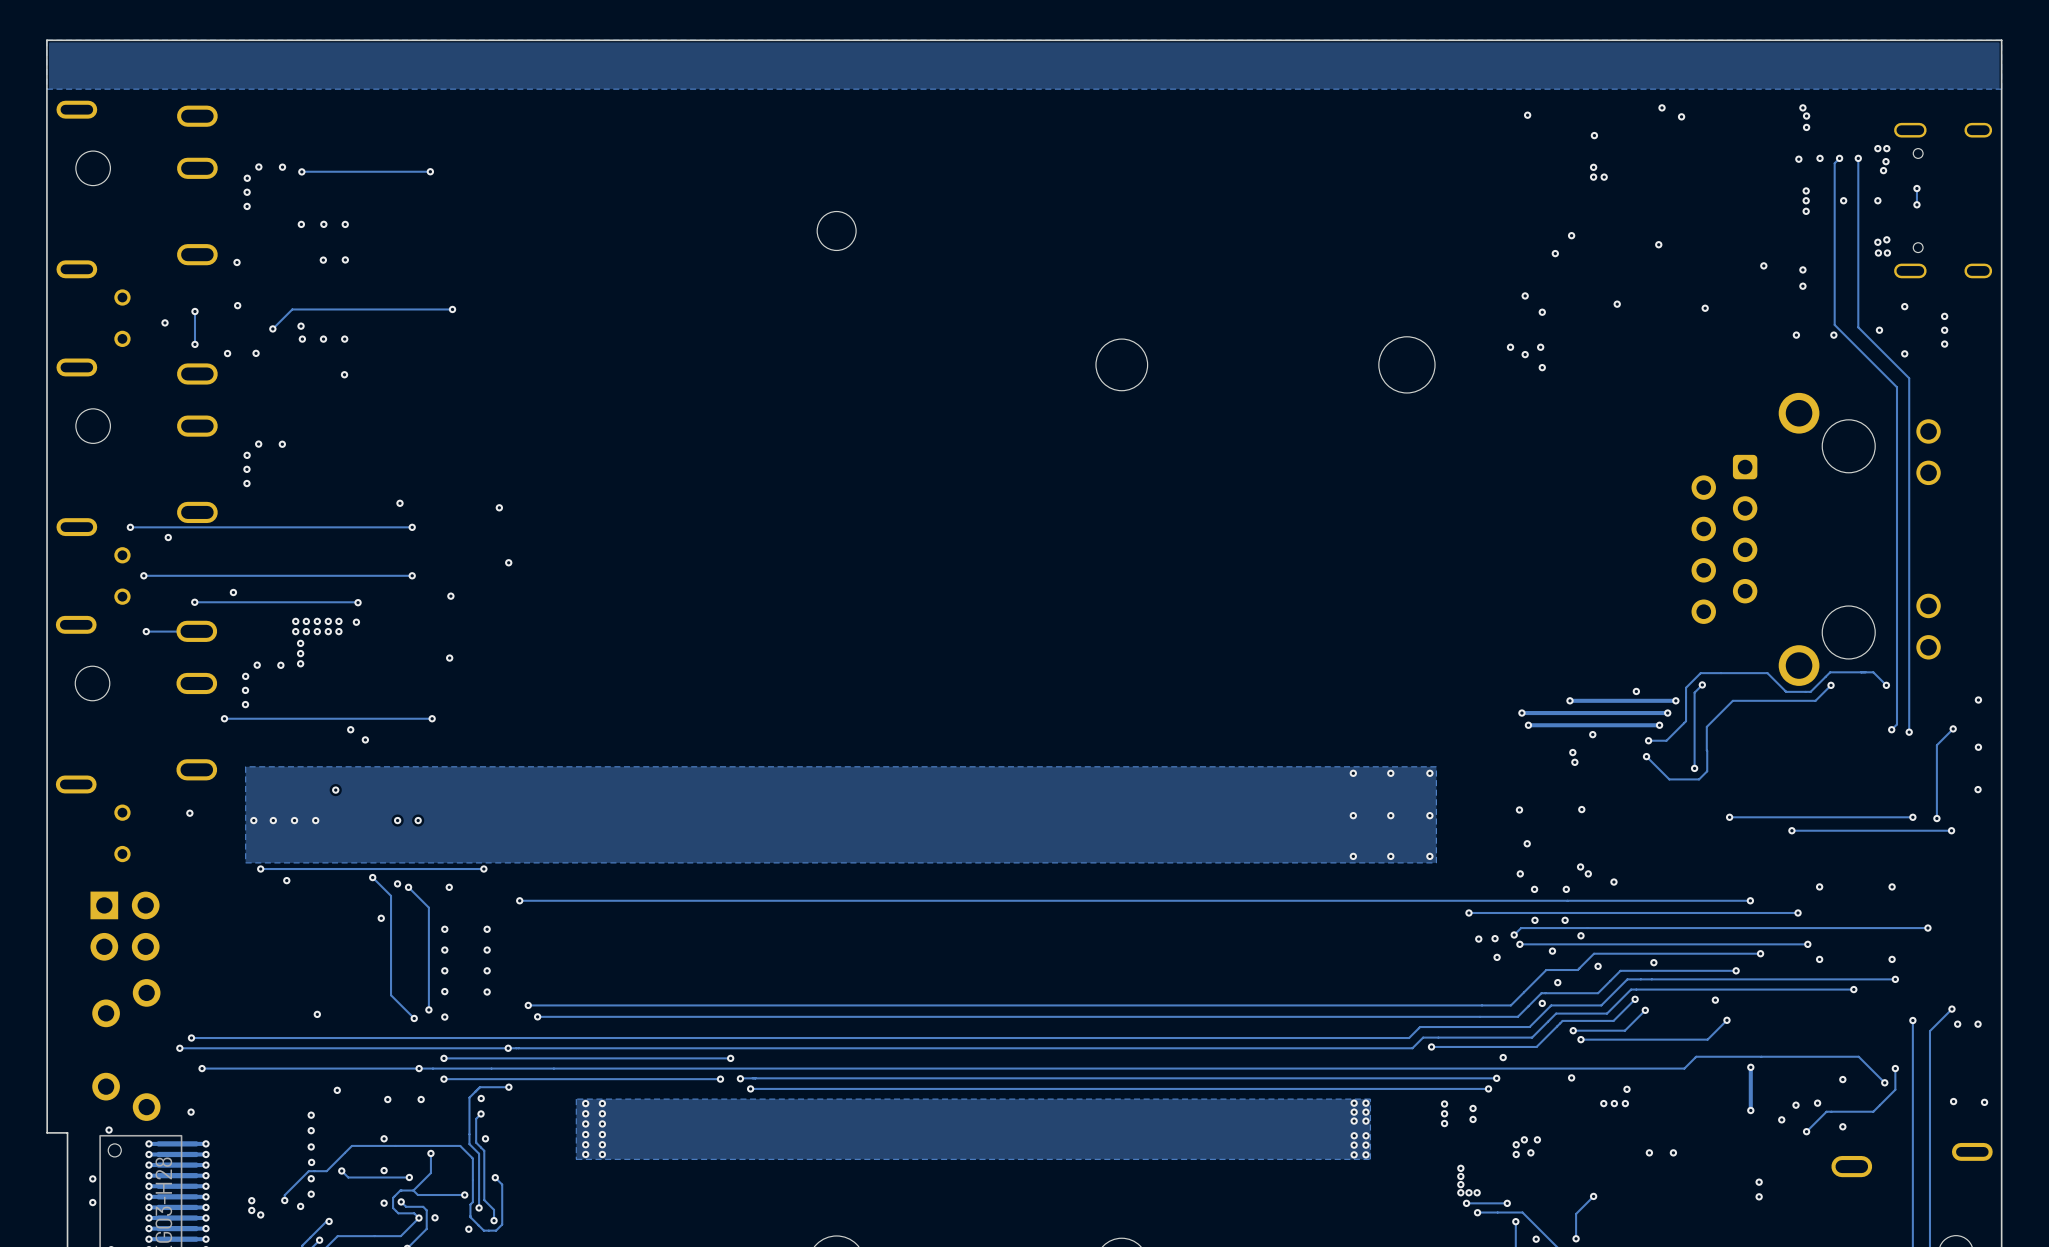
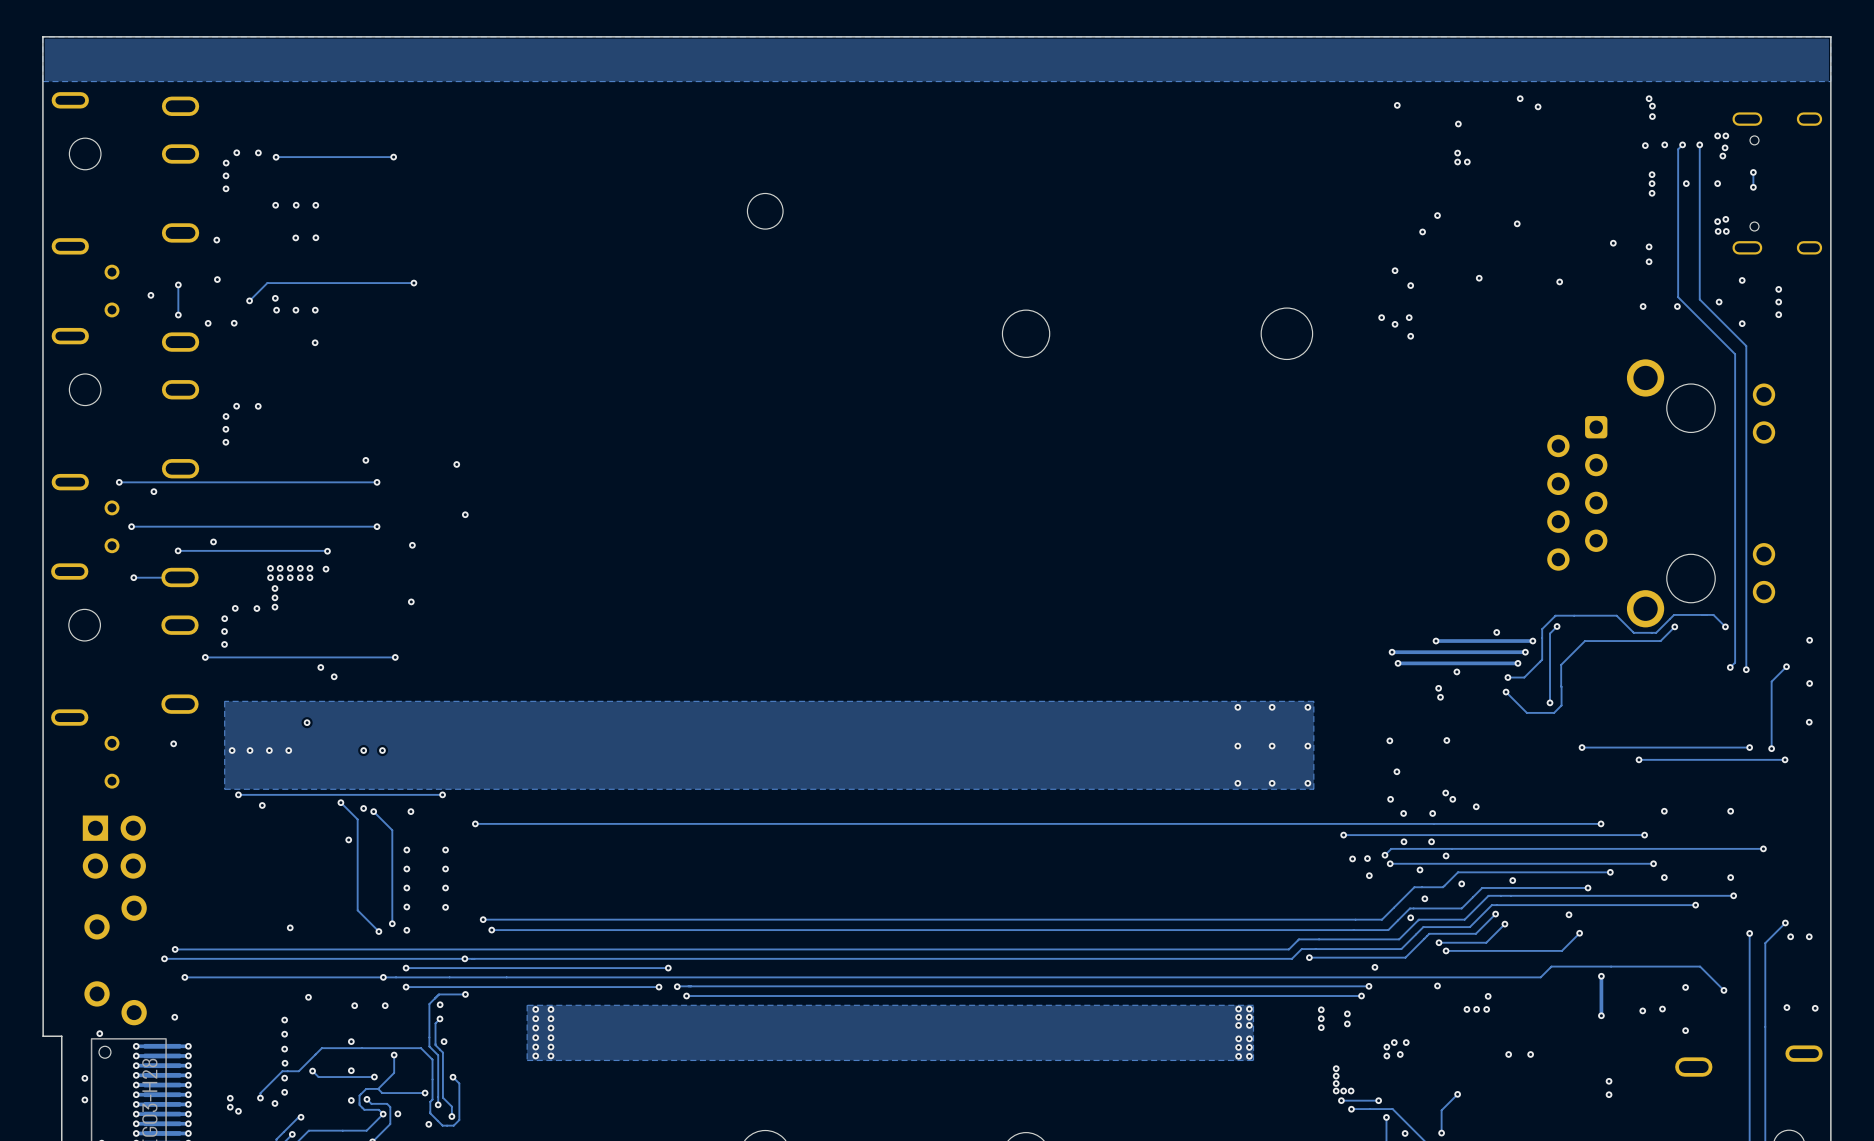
track: (1895, 1068) (1895, 1089) (1873, 1111) (1826, 1111) (1806, 1131) -> none
via: (1895, 1068) -> none
via: (1781, 1119) -> none
via: (1806, 1131) -> none

